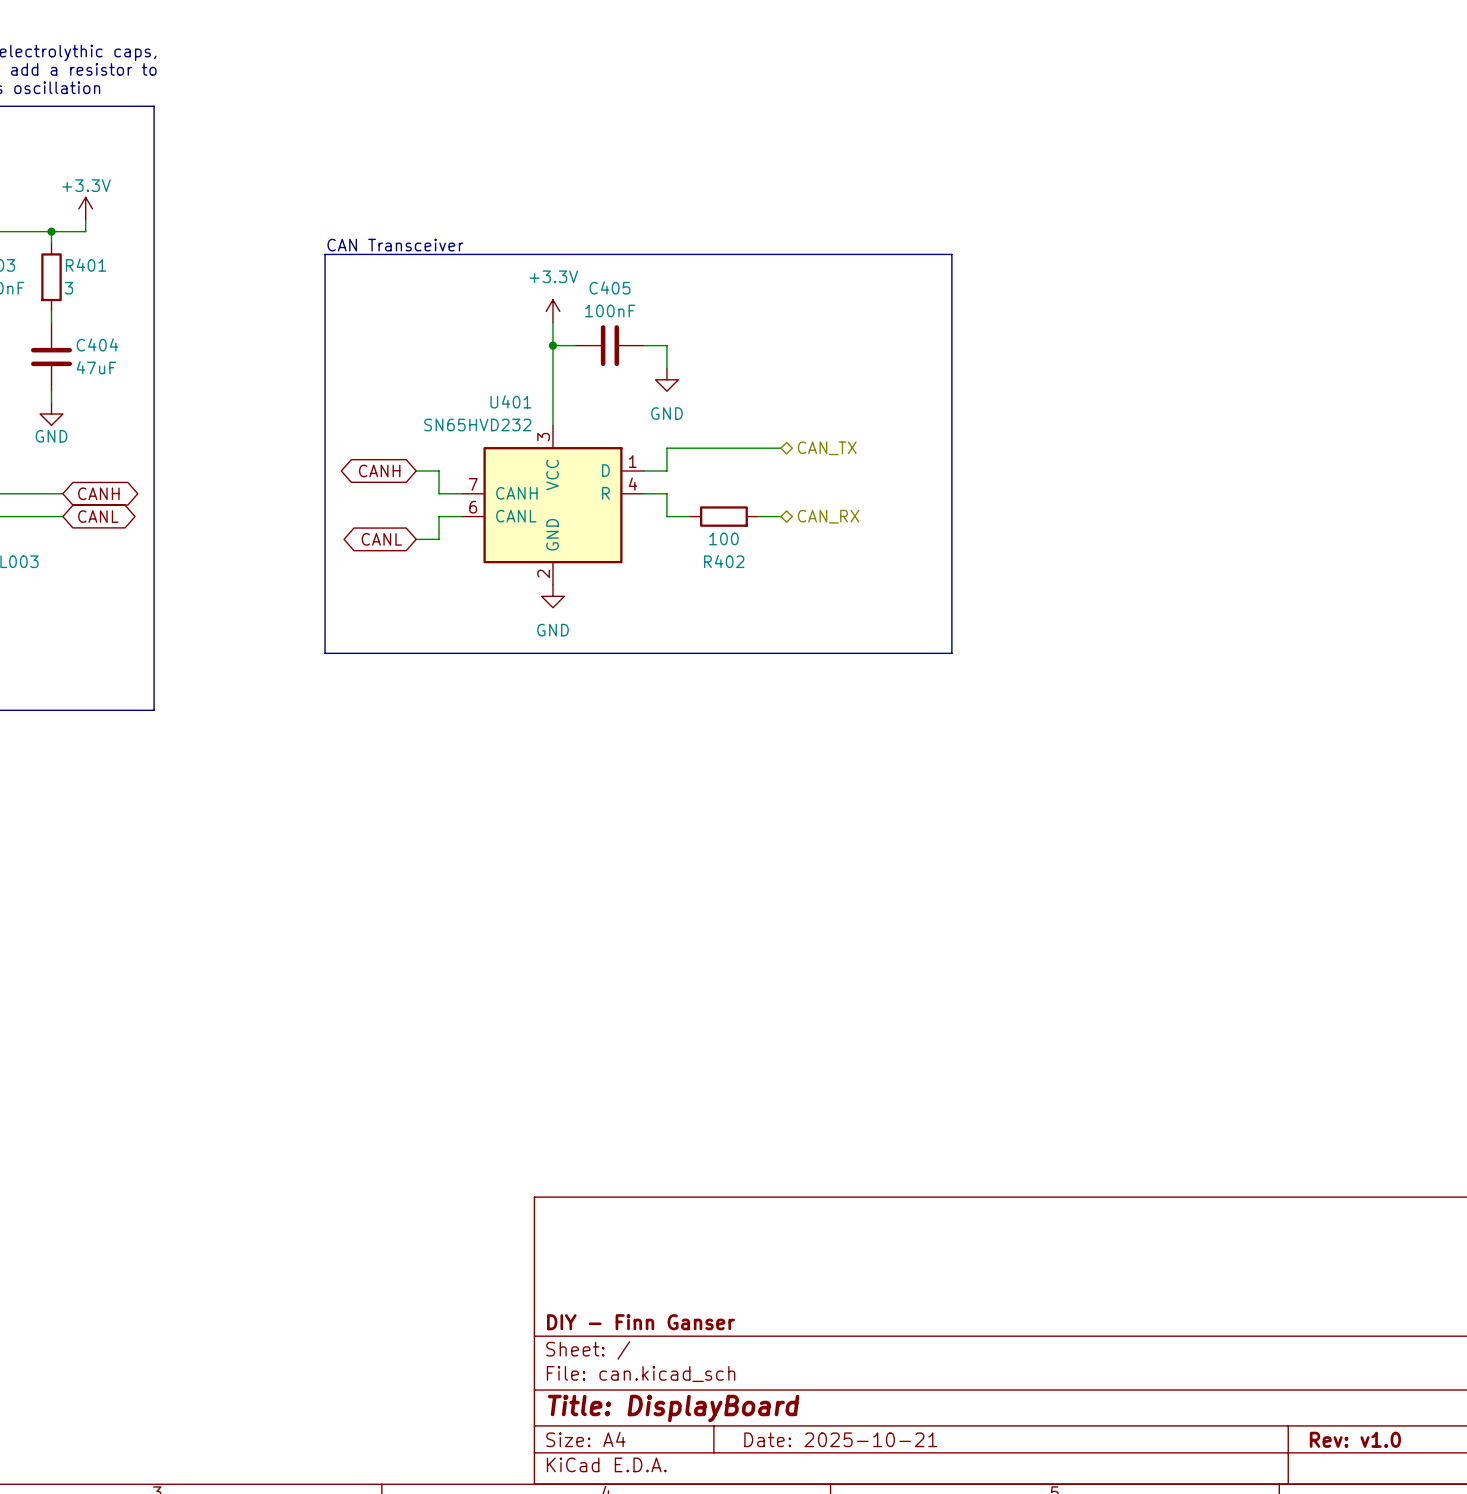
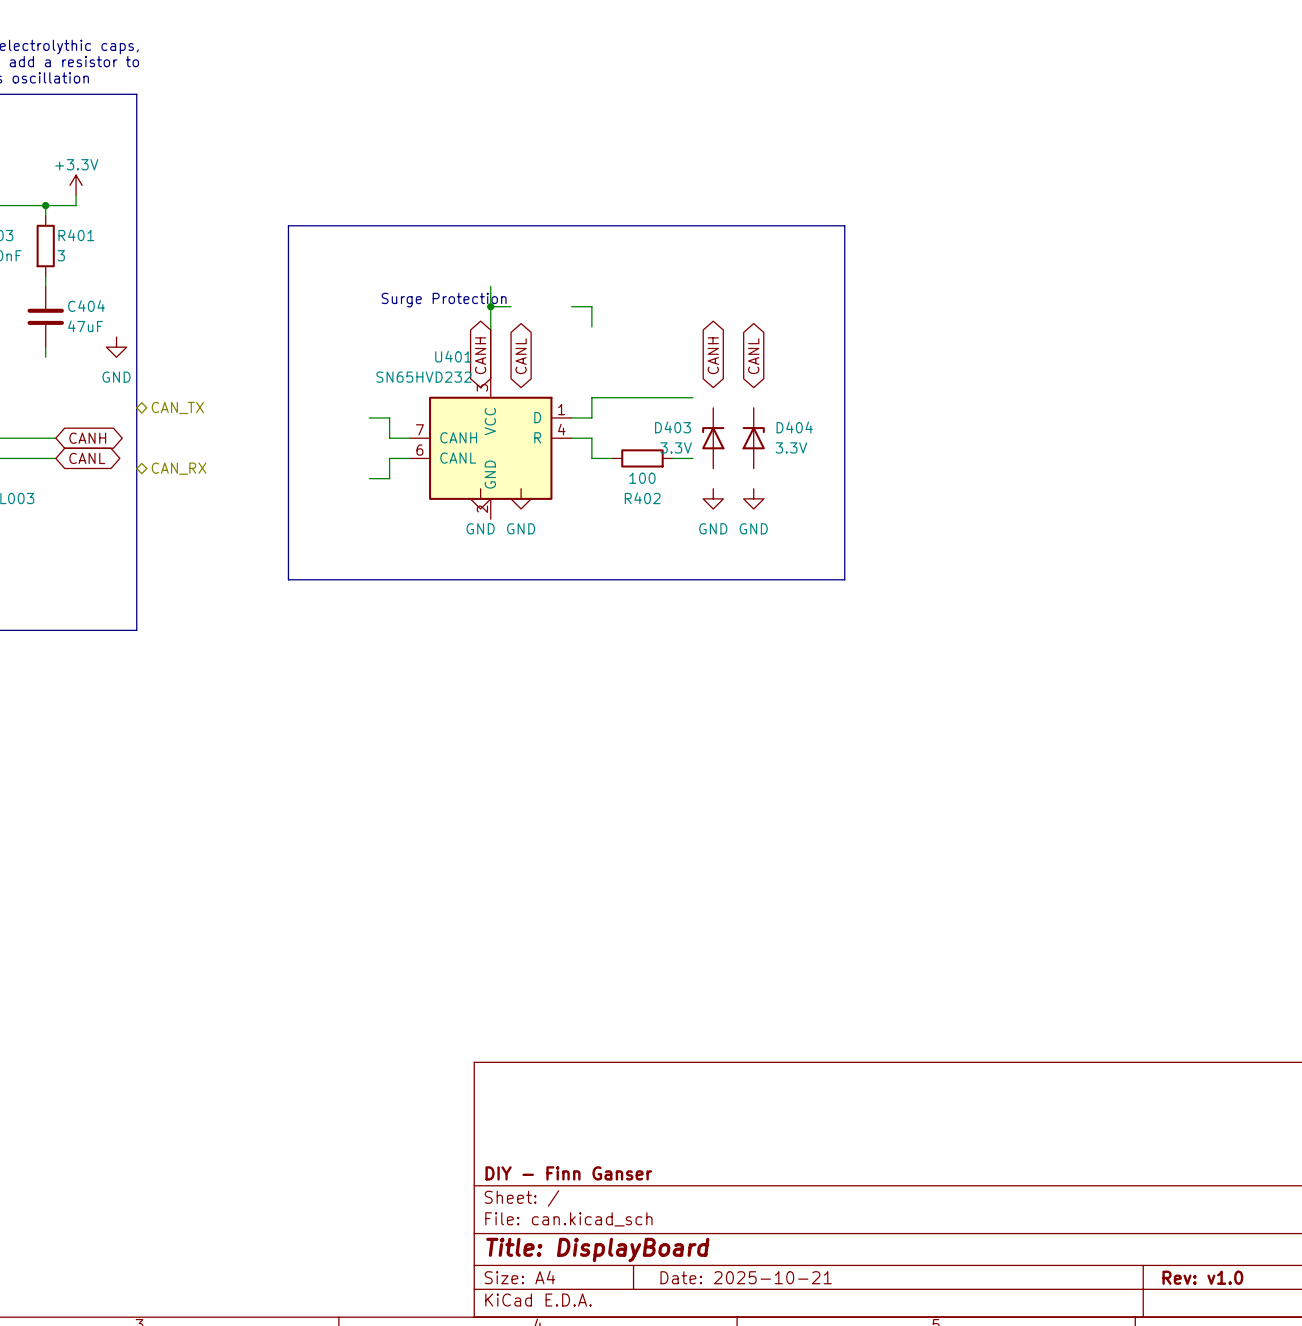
text: CAN Transceiver (395, 245) -> none
power symbol: +3.3V (552, 311) -> none
text: none -> Surge Protection (444, 300)
C405: 100nF (609, 345) -> none
power symbol: GND (666, 379) -> none
global label: none -> CANH (713, 355)
global label: none -> CANL (753, 356)
power symbol position: GND (51, 414) -> GND (116, 347)
power symbol text position: GND (51, 436) -> GND (116, 377)
hierarchical label: CAN_TX (827, 448) -> none
hierarchical label: none -> CAN_TX (177, 407)
global label rotation: 0° (379, 470) -> 90° clockwise (480, 355)
global label position: CANH (379, 470) -> CANH (480, 355)
D403: none -> 3.3V (713, 438)
D404: none -> 3.3V (753, 438)
hierarchical label: CAN_RX (828, 516) -> none
hierarchical label: none -> CAN_RX (179, 468)
global label rotation: 0° (381, 539) -> 90° clockwise (521, 356)
global label position: CANL (381, 539) -> CANL (521, 356)
power symbol: none -> GND (480, 498)
power symbol: none -> GND (521, 498)
power symbol: none -> GND (713, 498)
power symbol: none -> GND (753, 498)
power symbol: GND (552, 596) -> none

